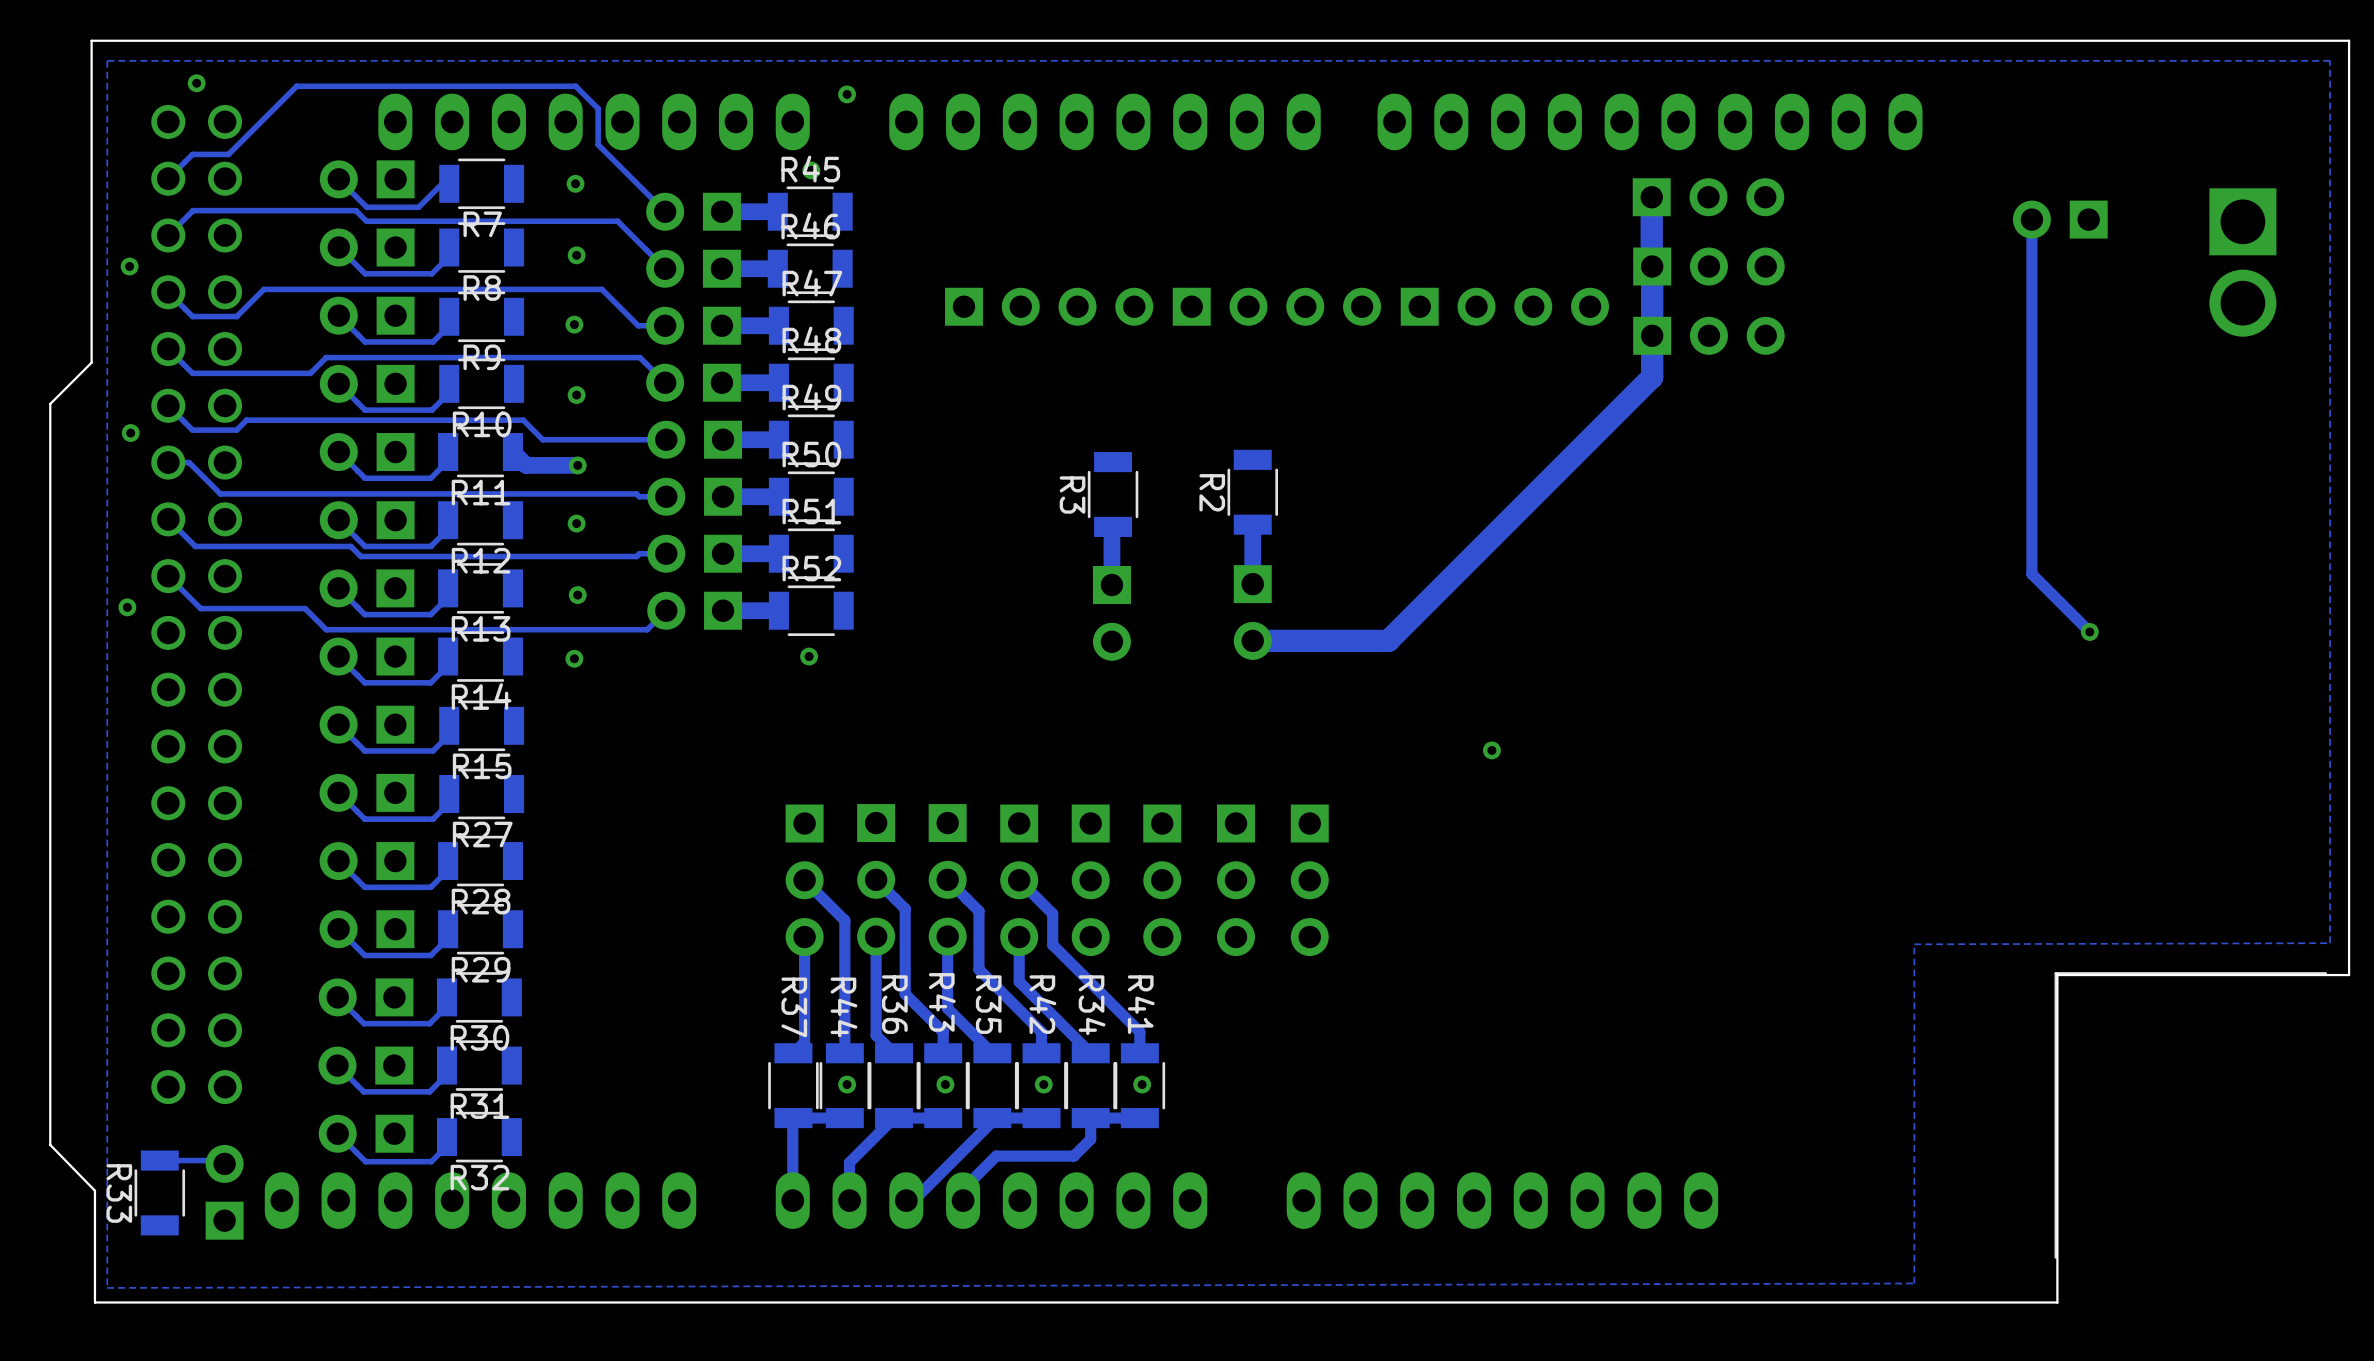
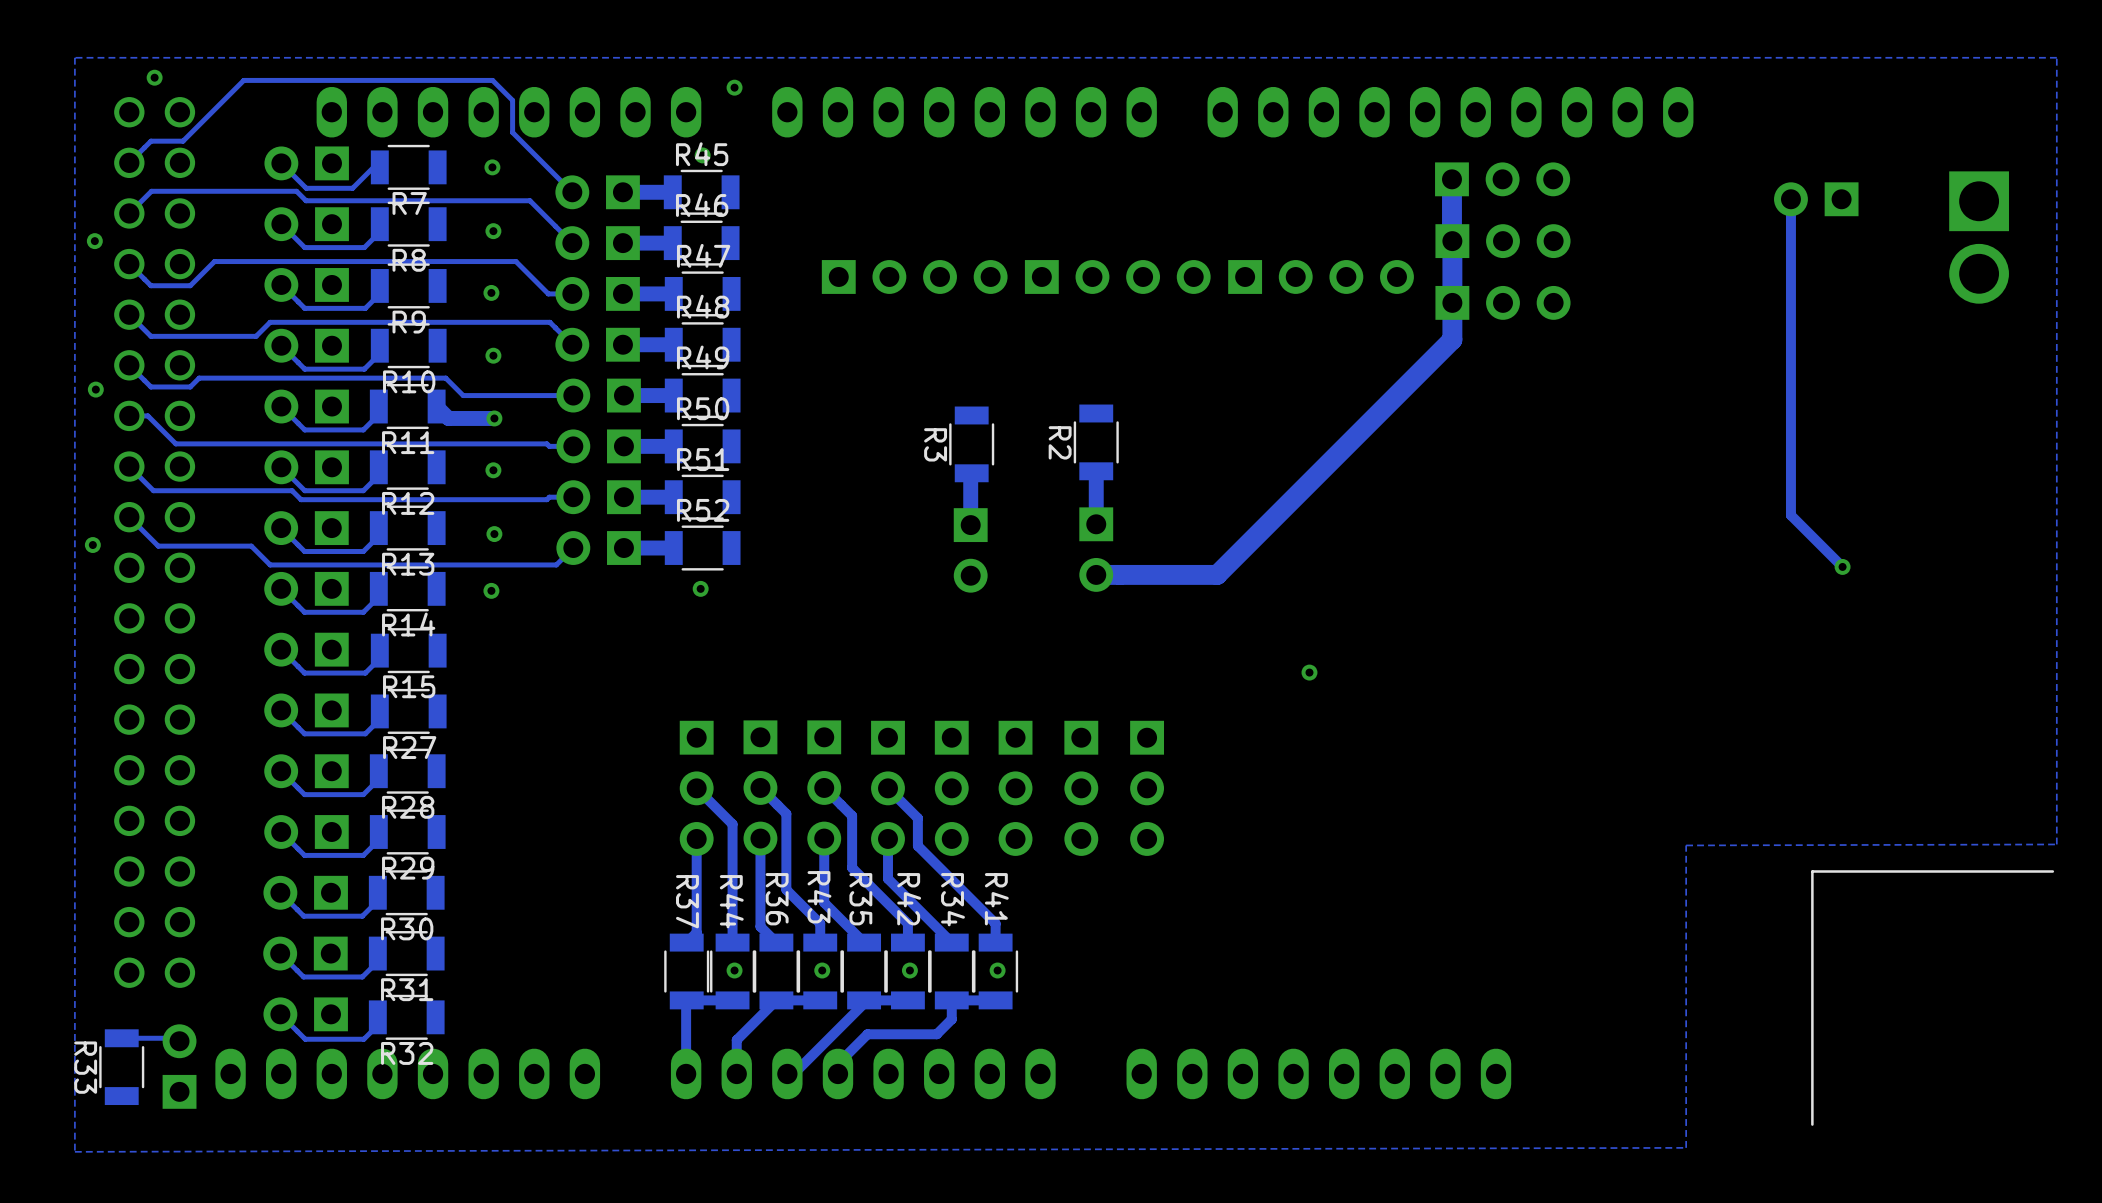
board edge: (2057, 973) (2057, 1302) (94, 1302) (94, 1190) (50, 1144) (50, 403) (91, 362) (91, 40) (2349, 40) (2349, 975) (2057, 975) -> none

